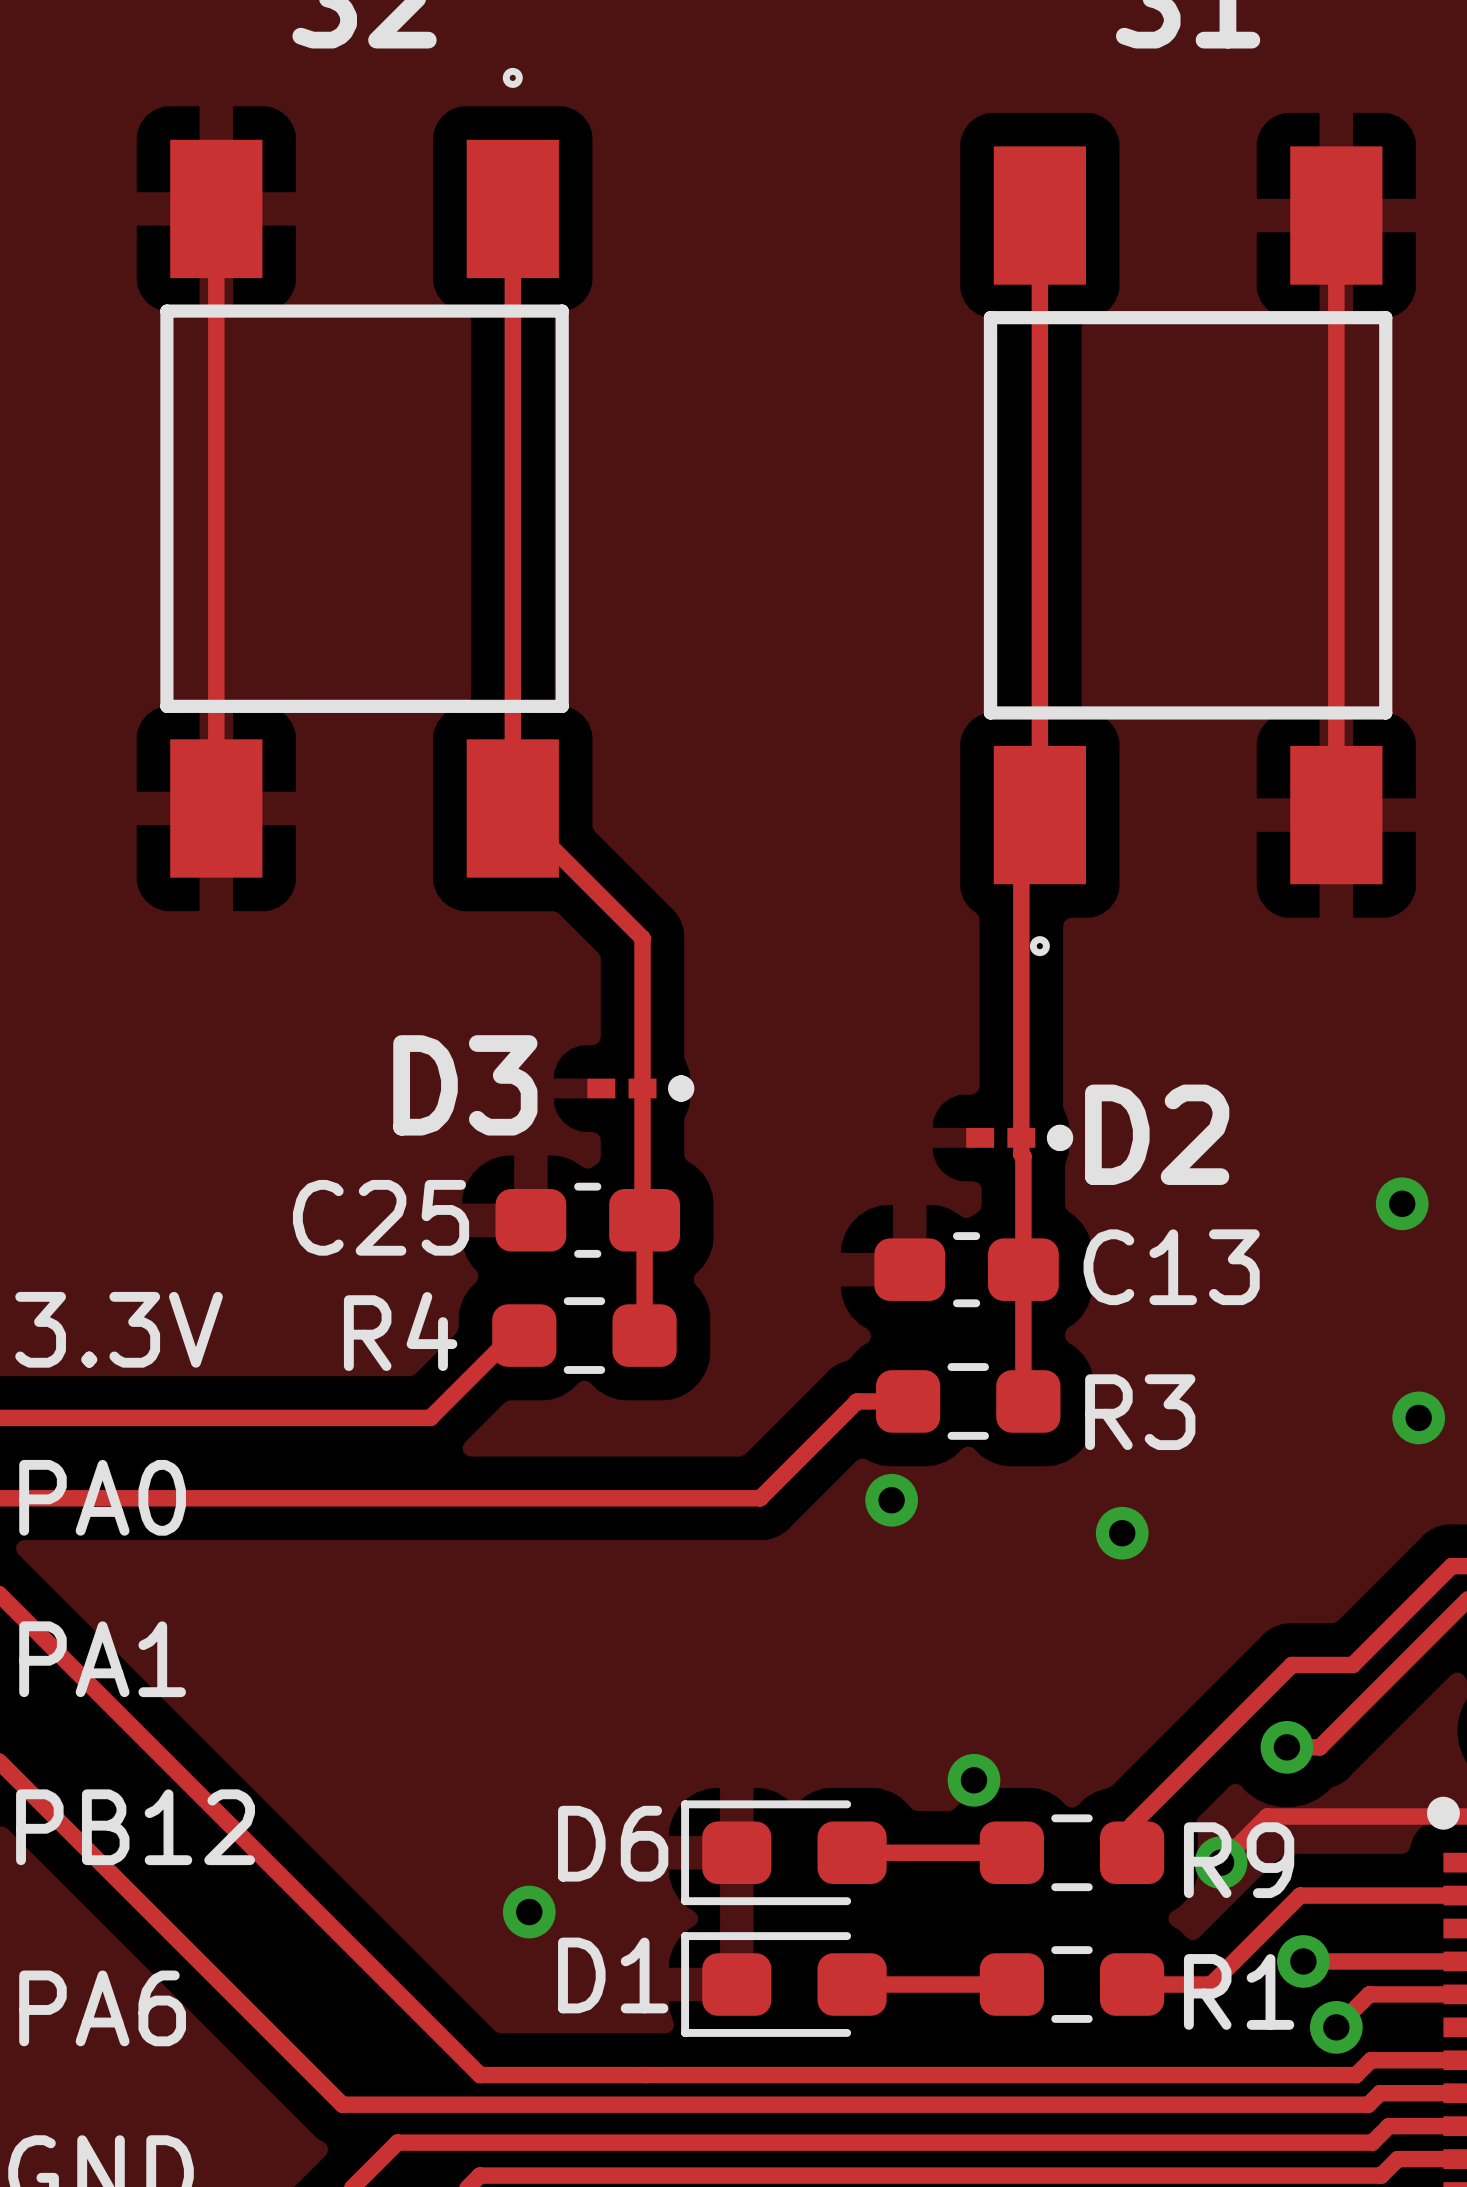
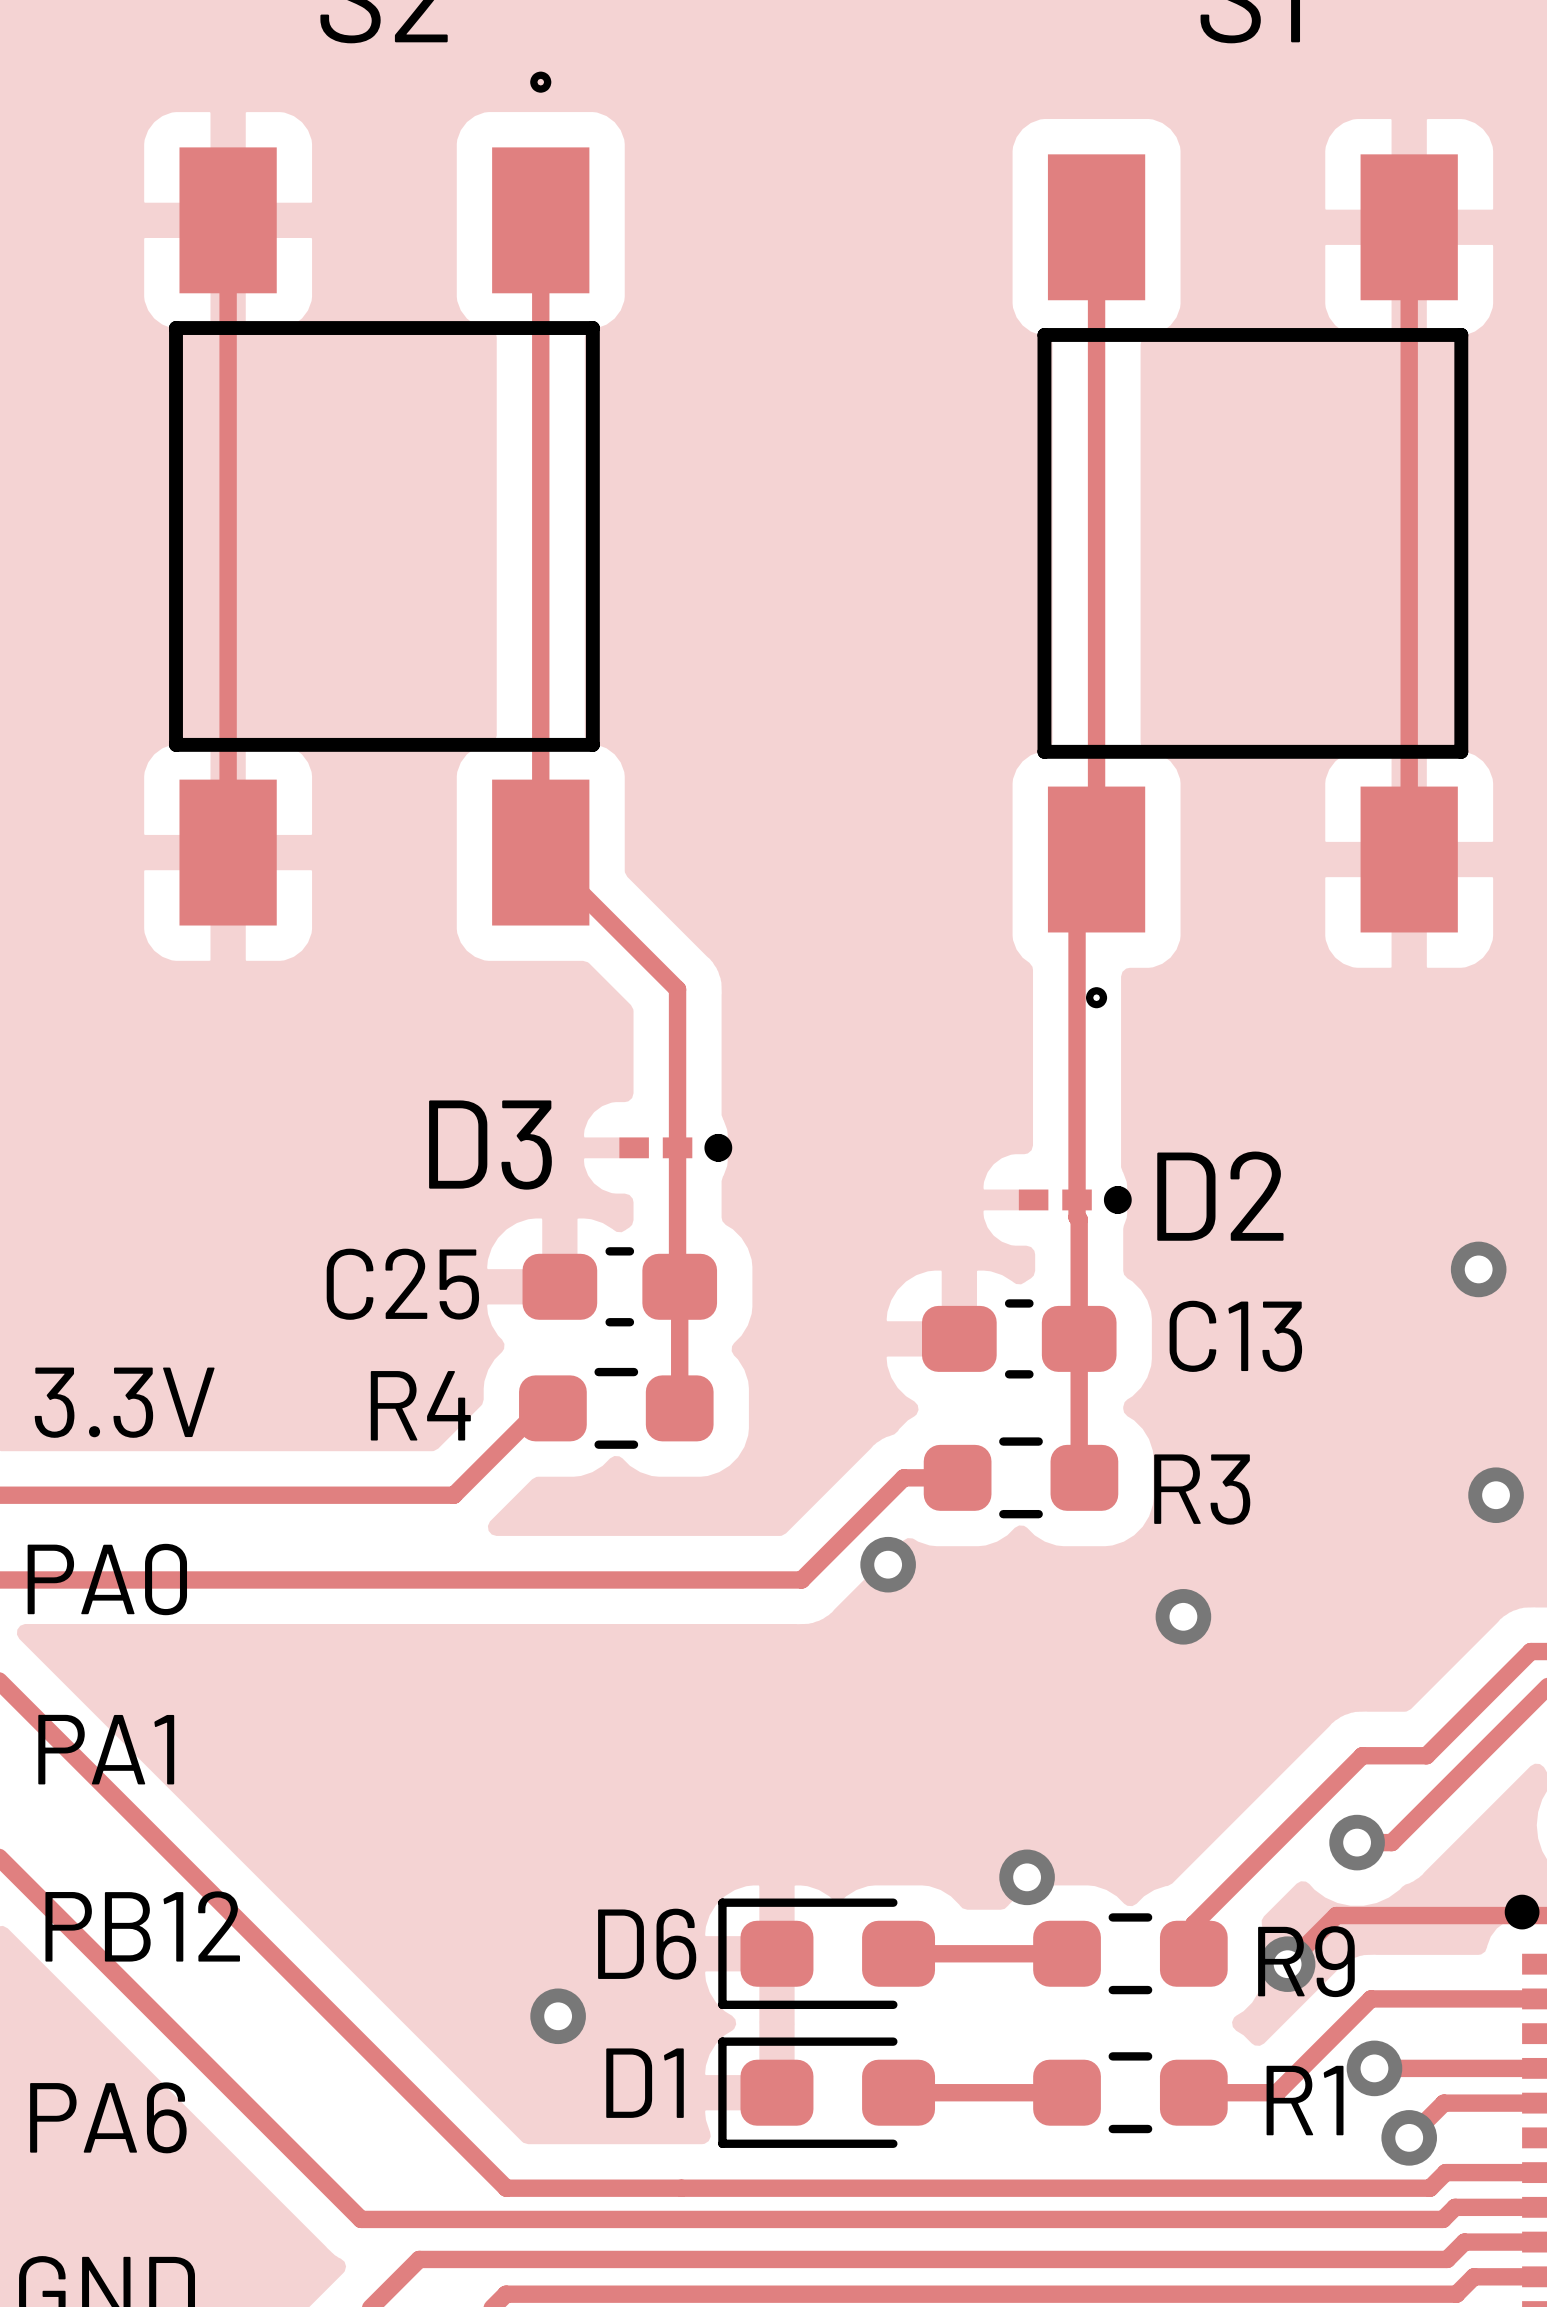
via position: (891, 1500) -> (888, 1564)

